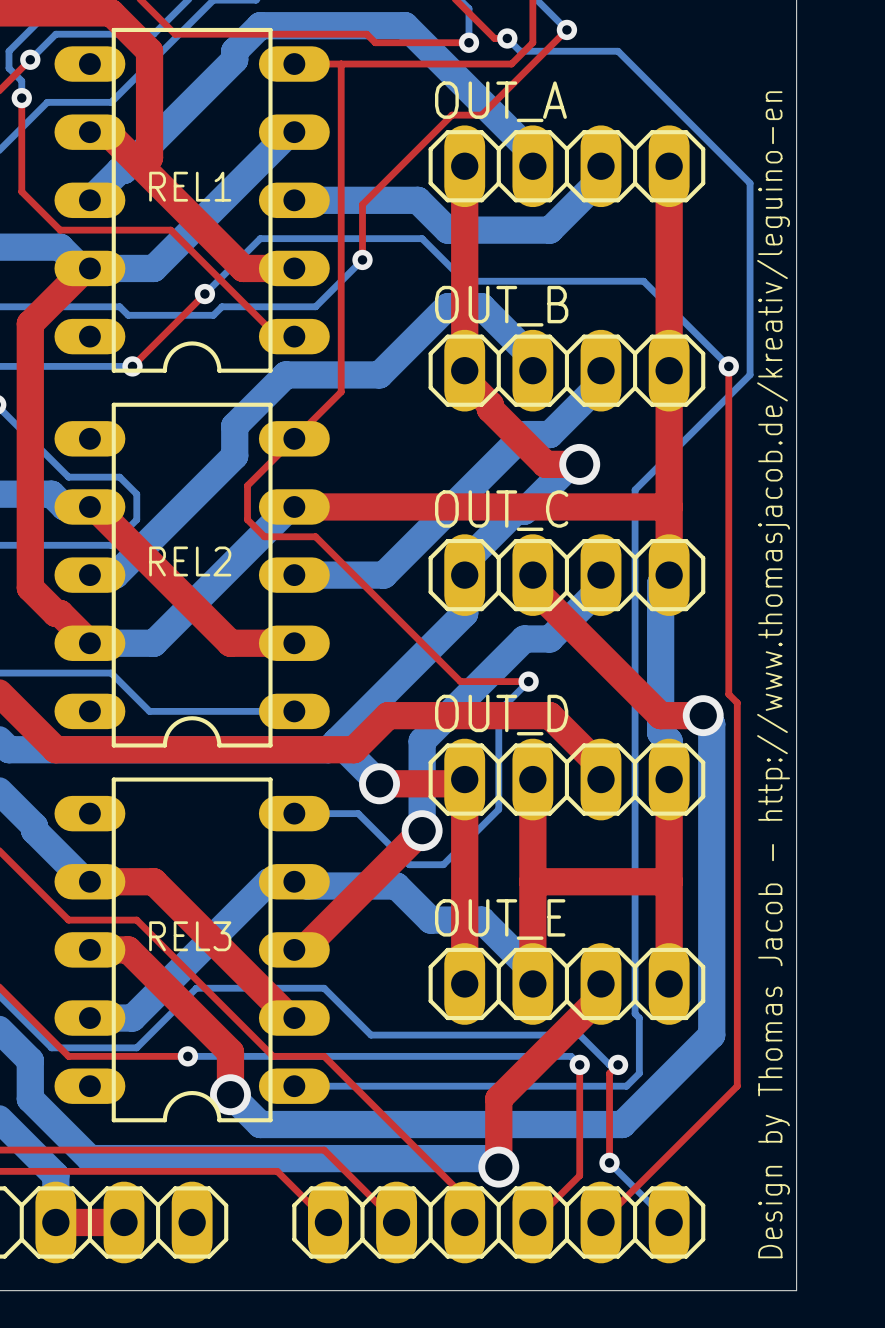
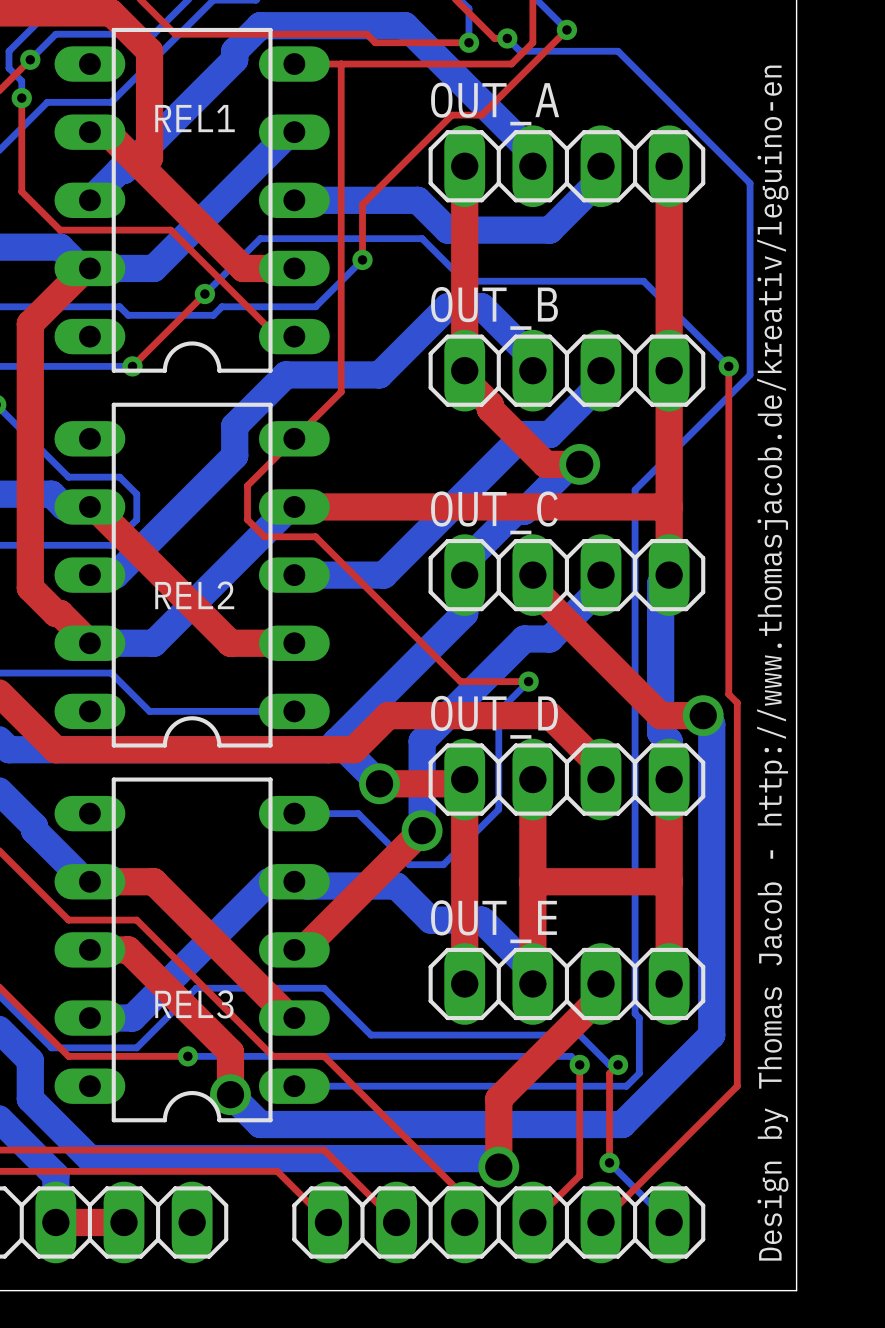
REL1 name position: REL1 (190, 186) -> REL1 (195, 118)
REL2 name position: REL2 (190, 561) -> REL2 (194, 595)
REL3 name position: REL3 (190, 936) -> REL3 (194, 1004)

